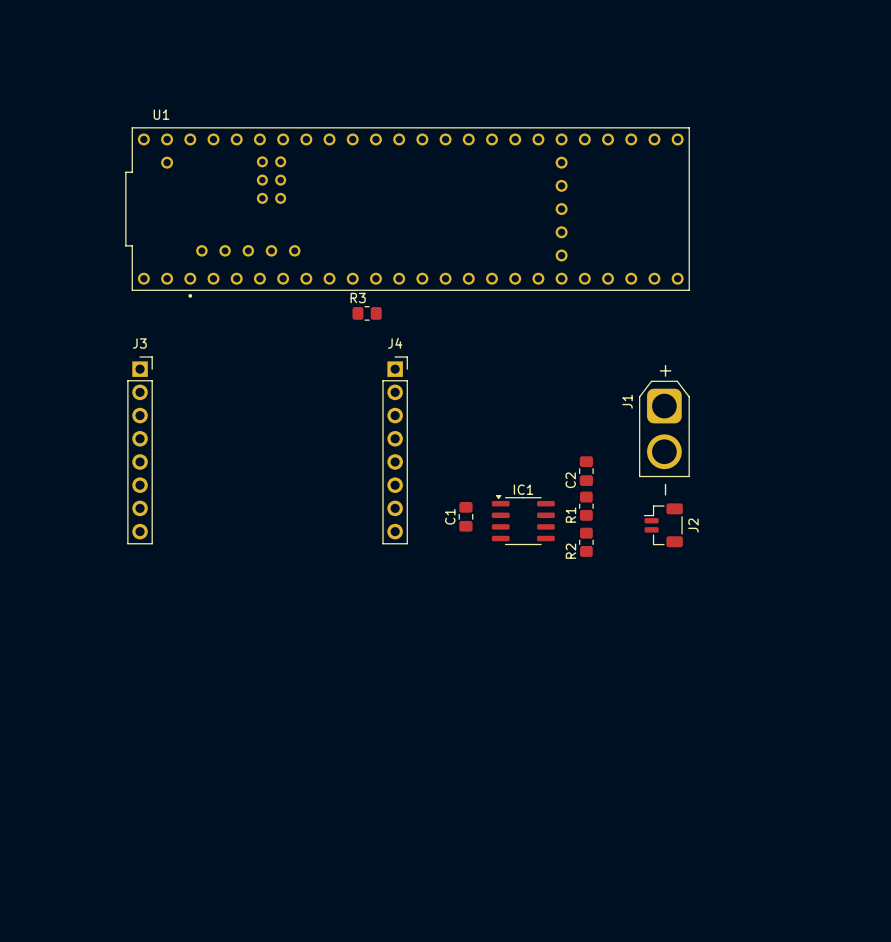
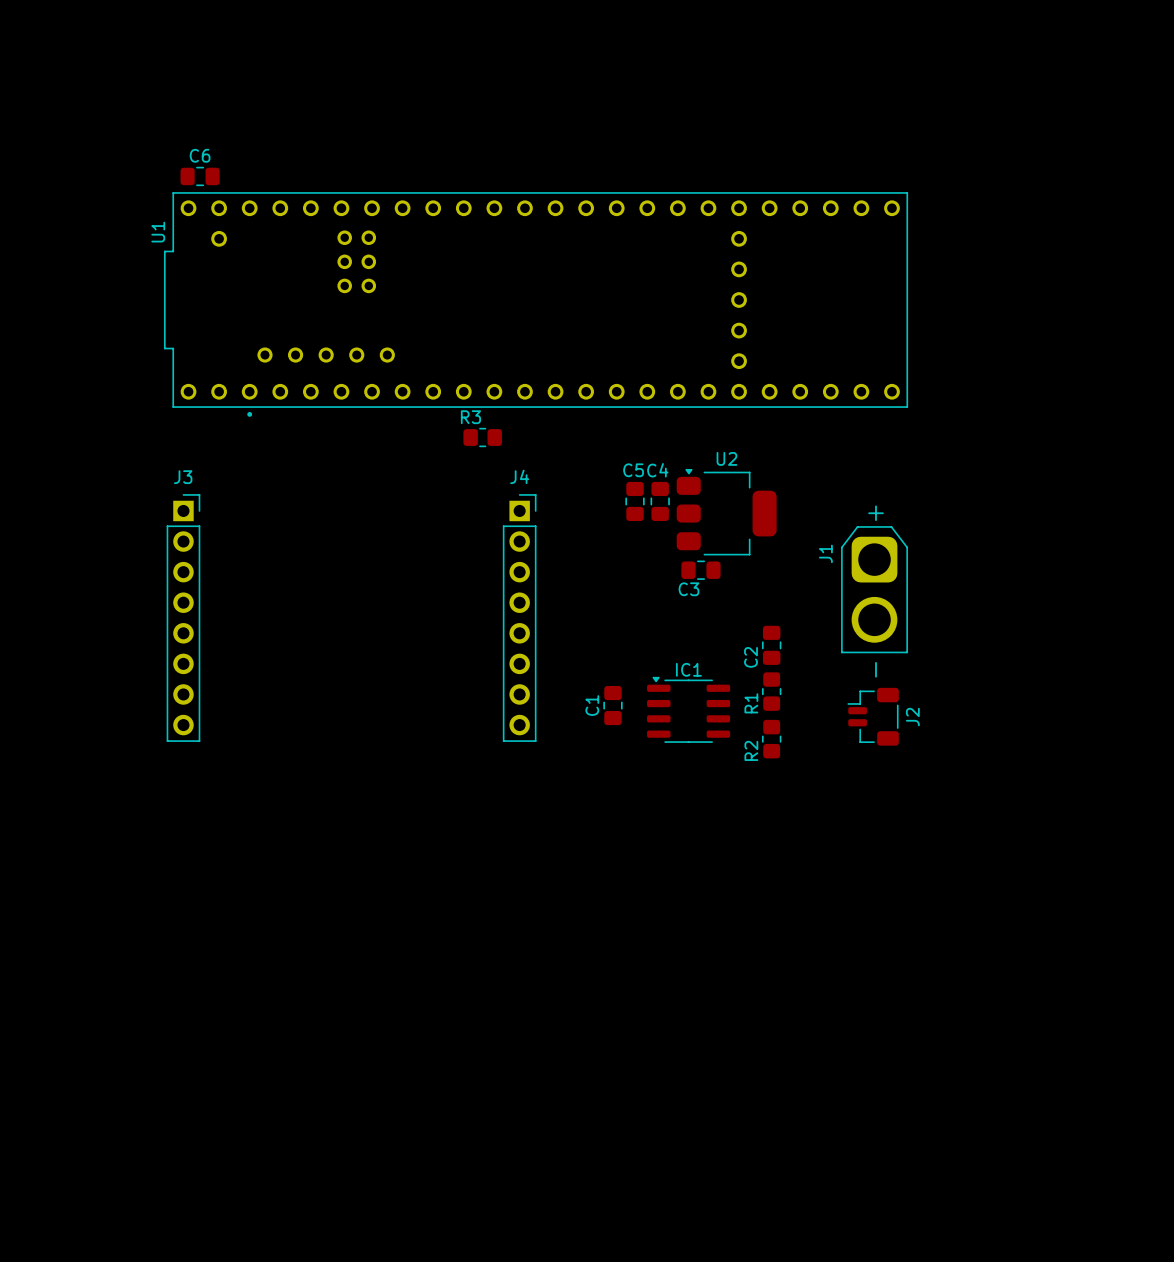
U1 name rotation: 0° (161, 114) -> 90° counterclockwise (158, 232)
U1 name position: U1 (161, 114) -> U1 (158, 232)
C6: none -> (200, 176)
C5: none -> (635, 501)
C4: none -> (660, 501)
U2: none -> (726, 512)
C3: none -> (701, 570)

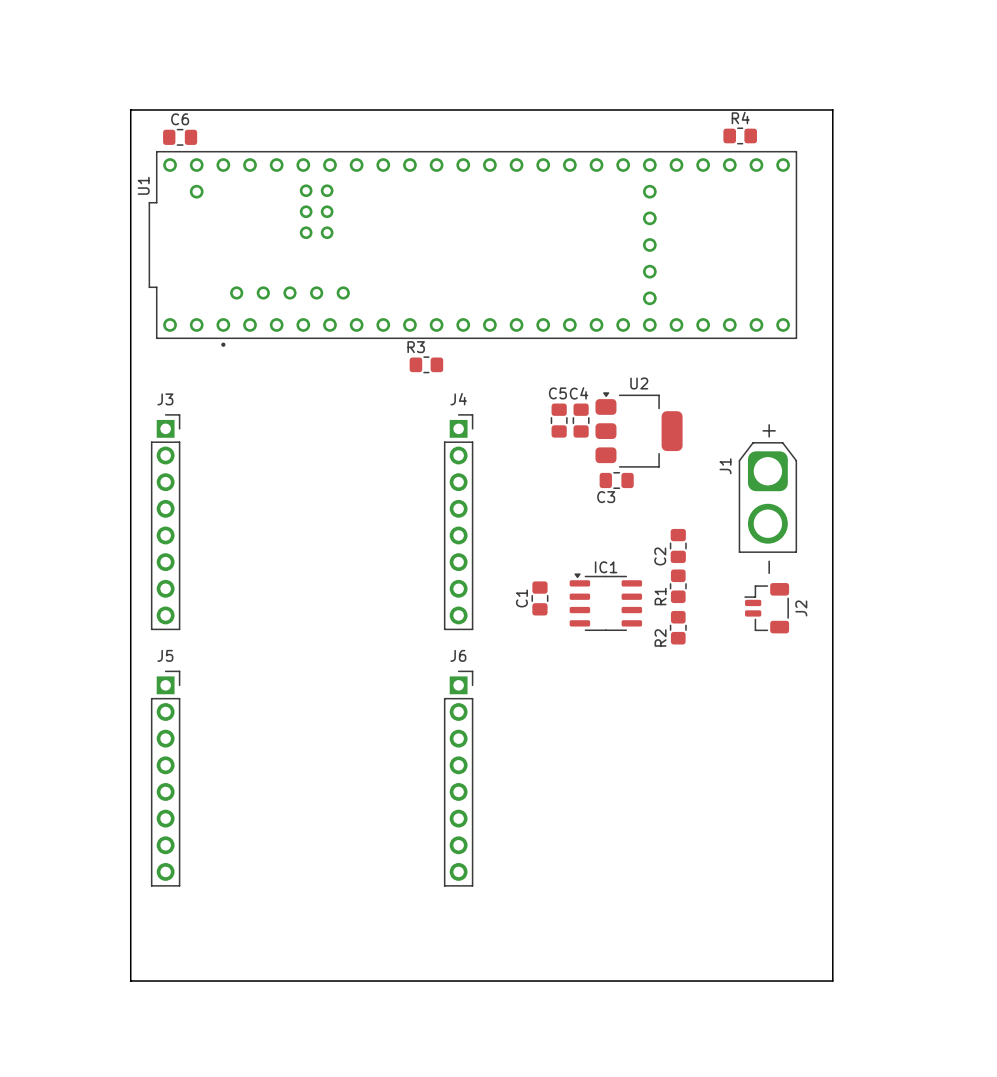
board edge: none -> (130, 109) (832, 109) (832, 981) (130, 981) (130, 109)
R4: none -> (740, 135)
J5: none -> (165, 778)
J6: none -> (458, 778)

